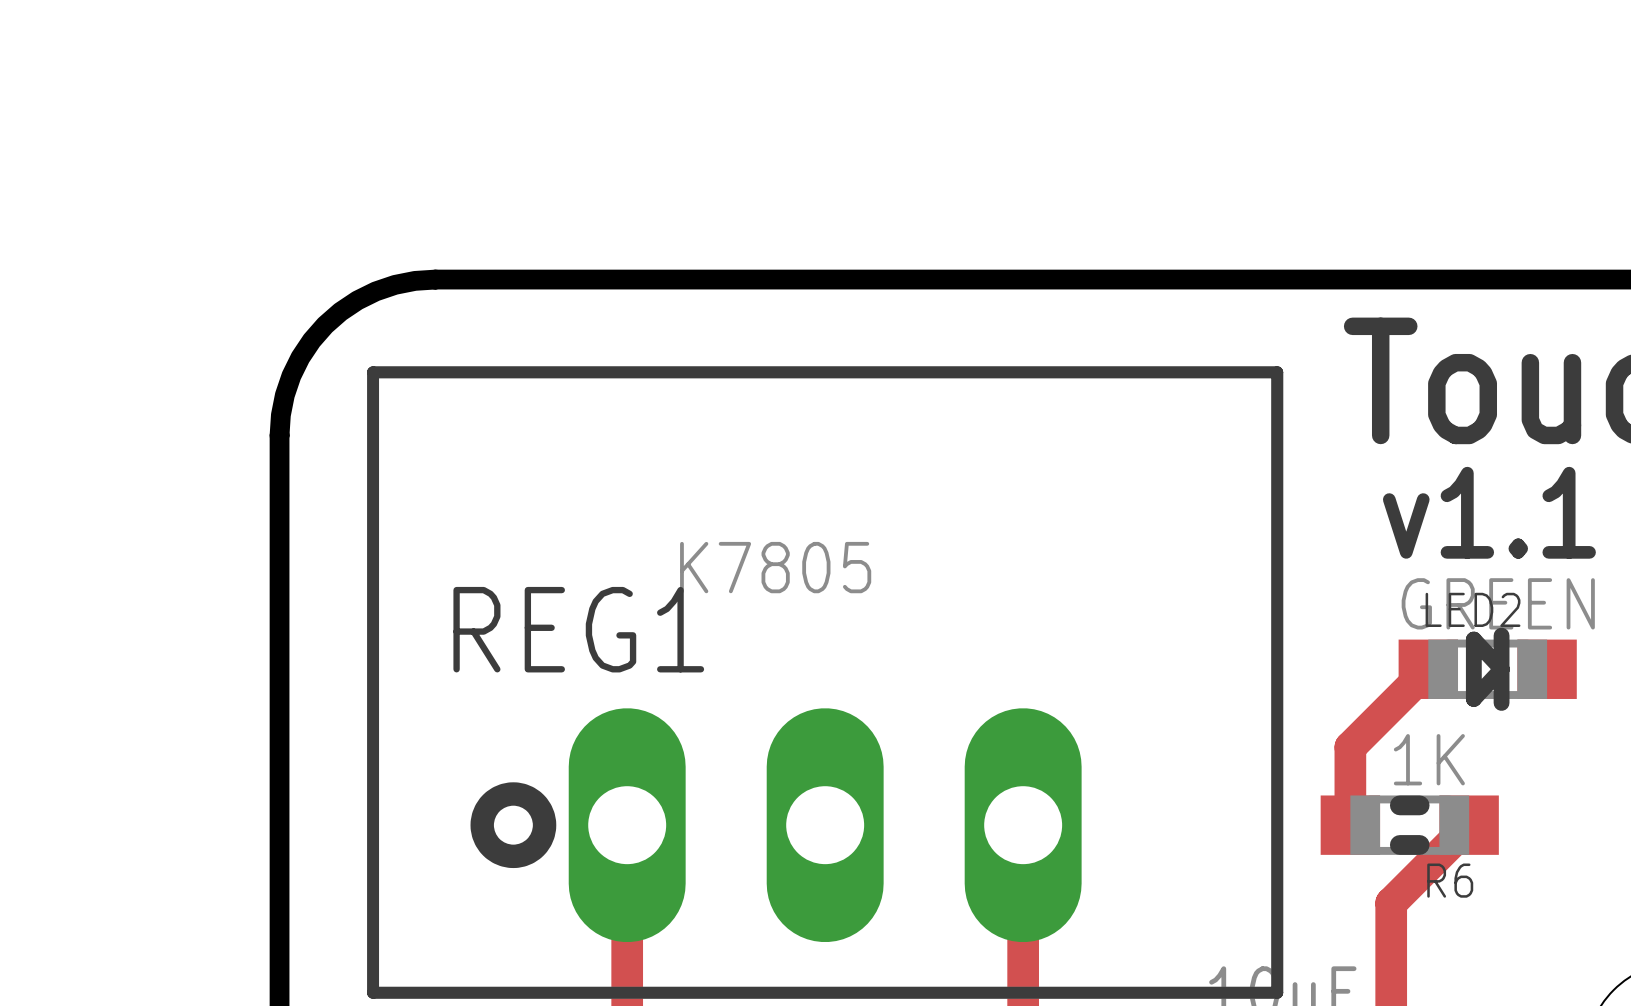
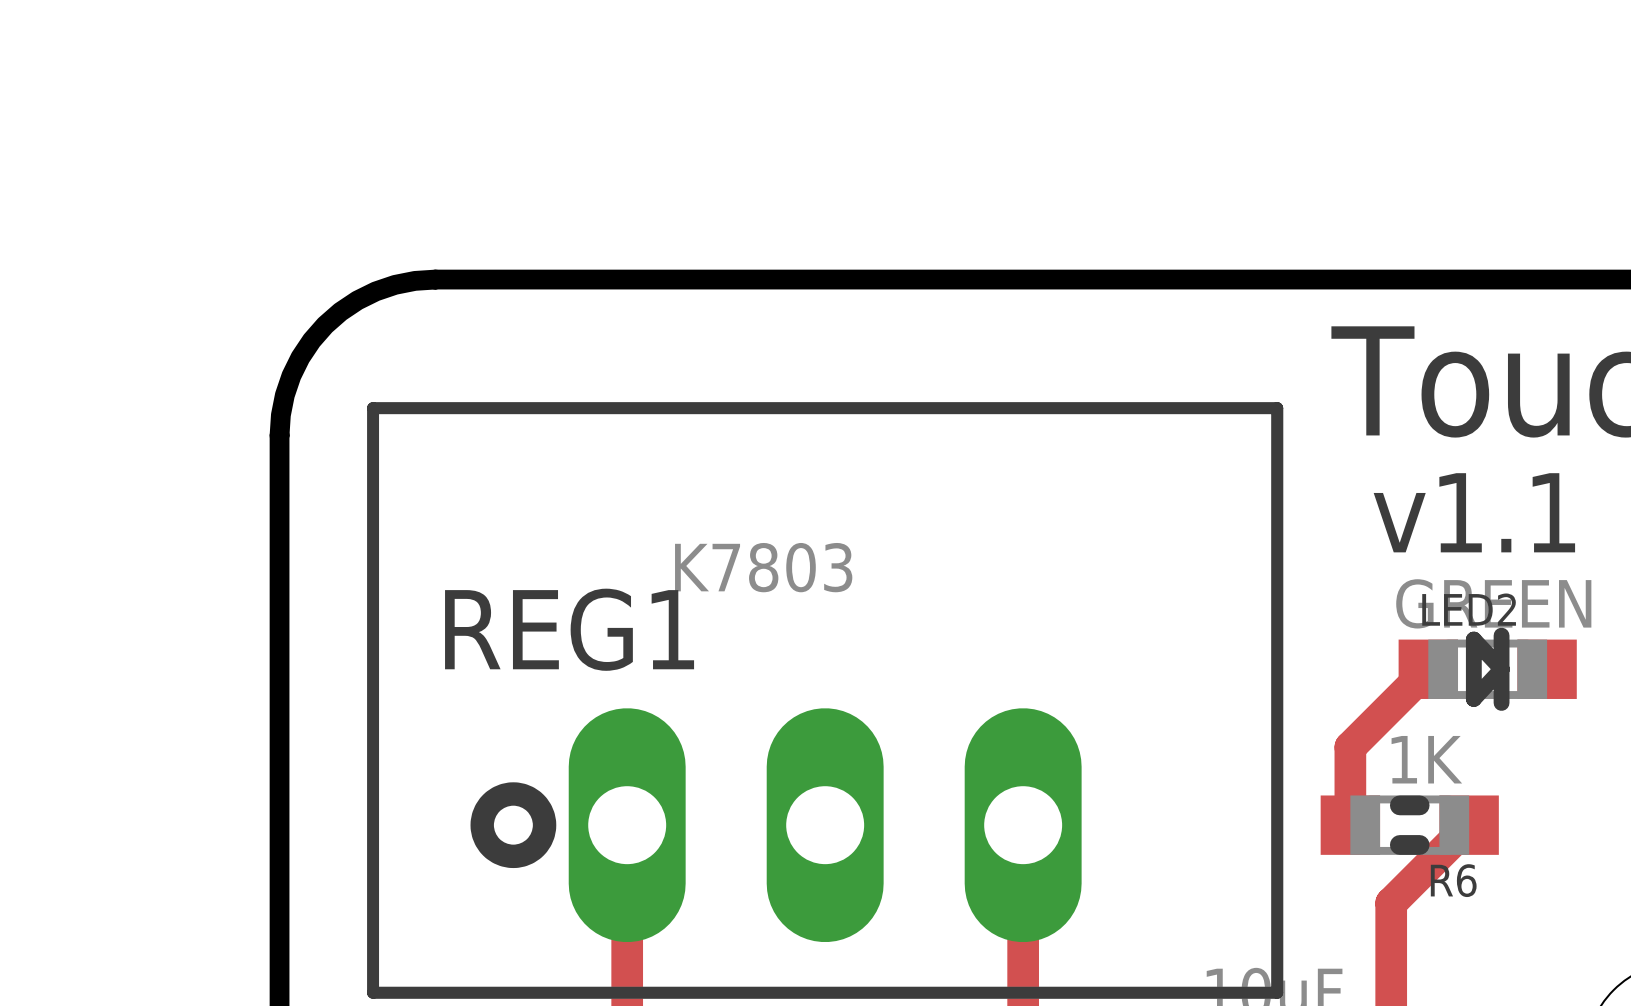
REG1 footprint: [367, 366, 1284, 999] -> [367, 402, 1284, 999]
REG1 value: K7805 (775, 567) -> K7803 (763, 567)

